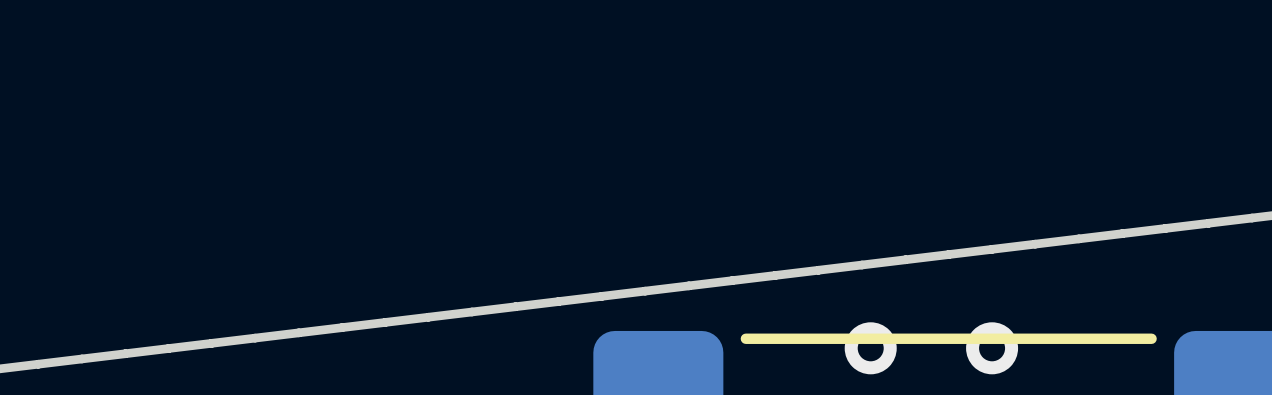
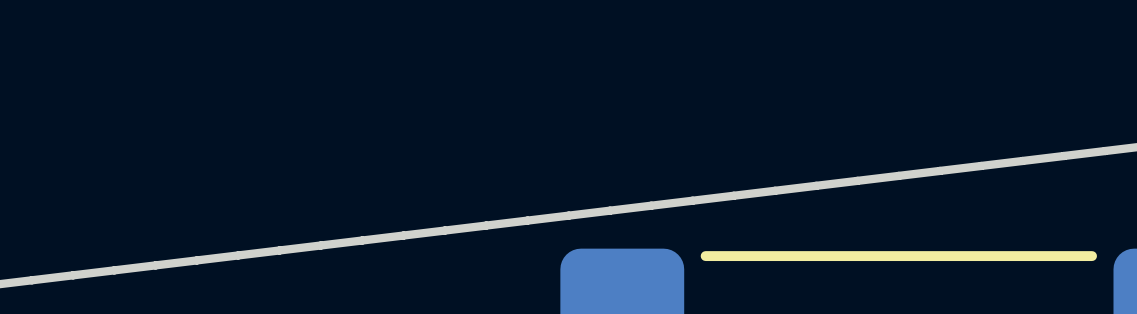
via: (870, 348) -> none
via: (992, 348) -> none

